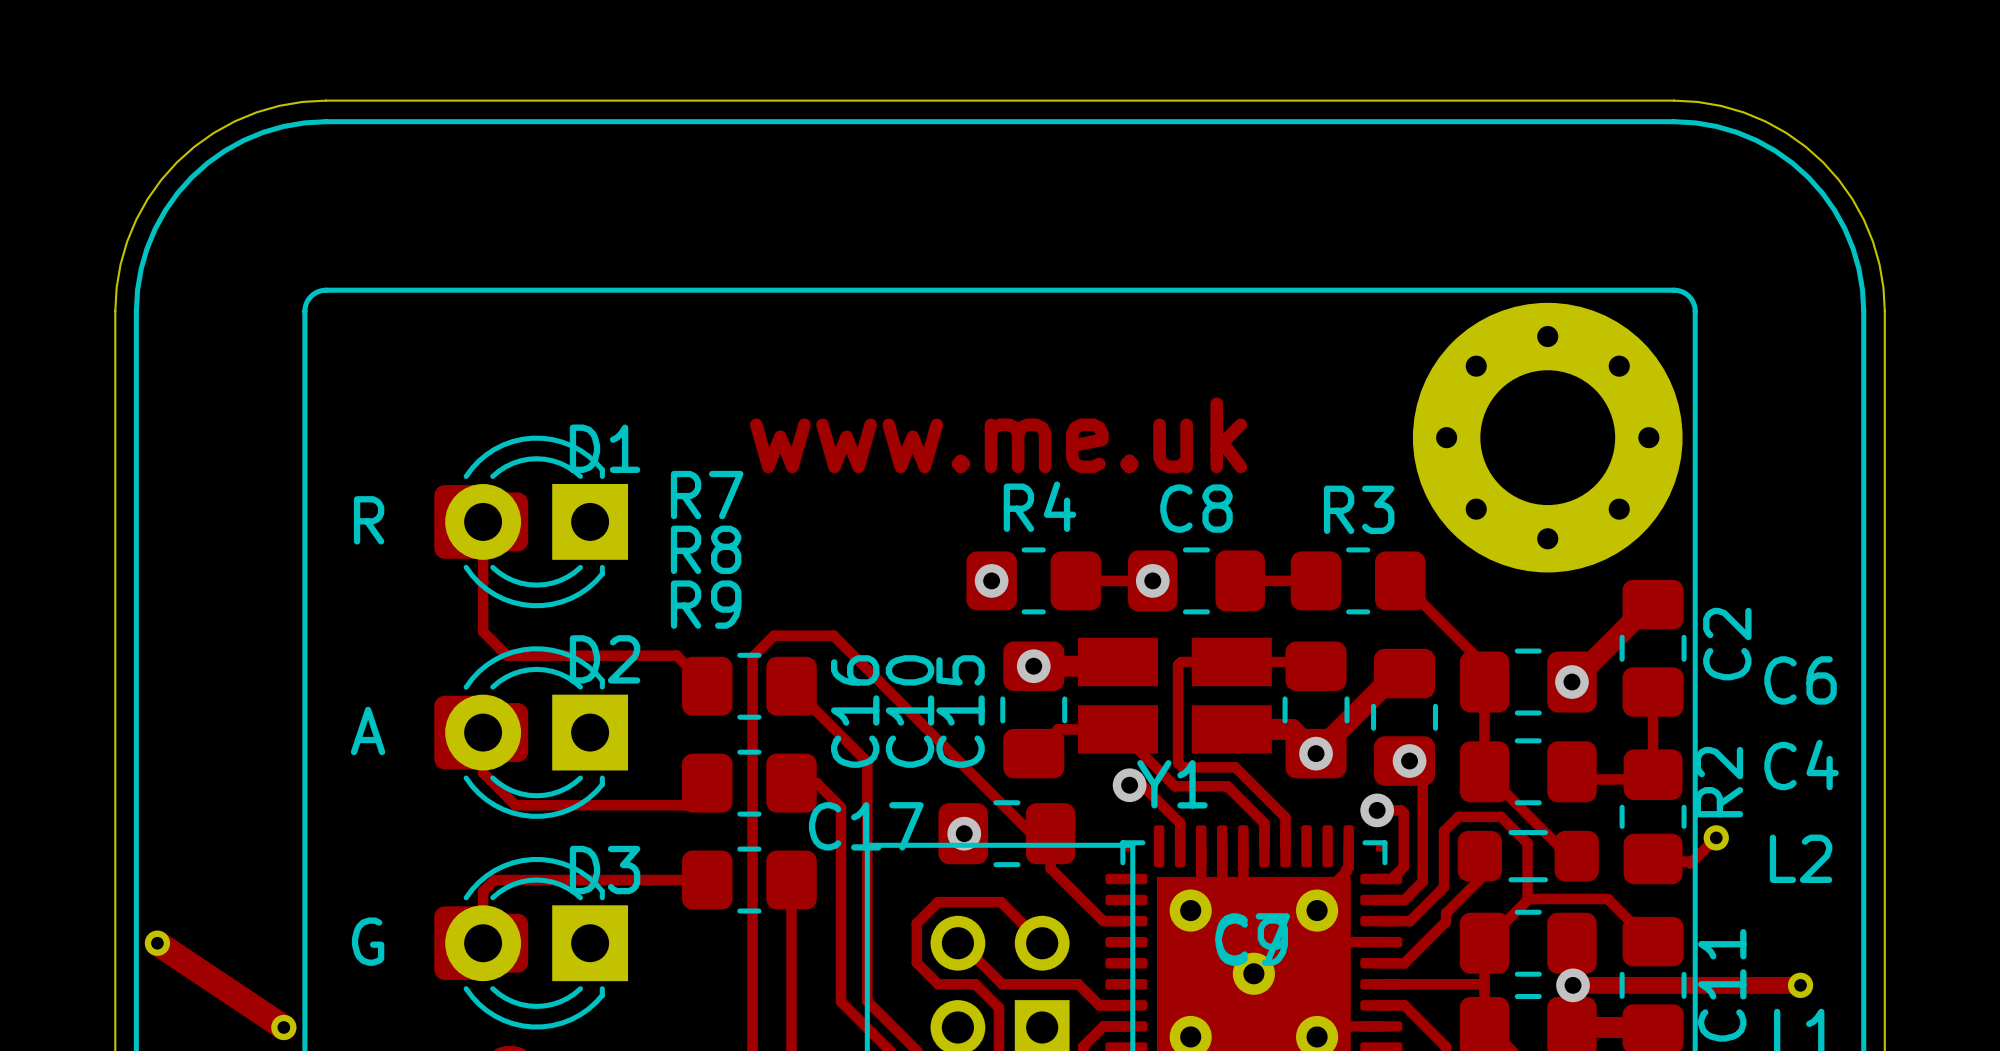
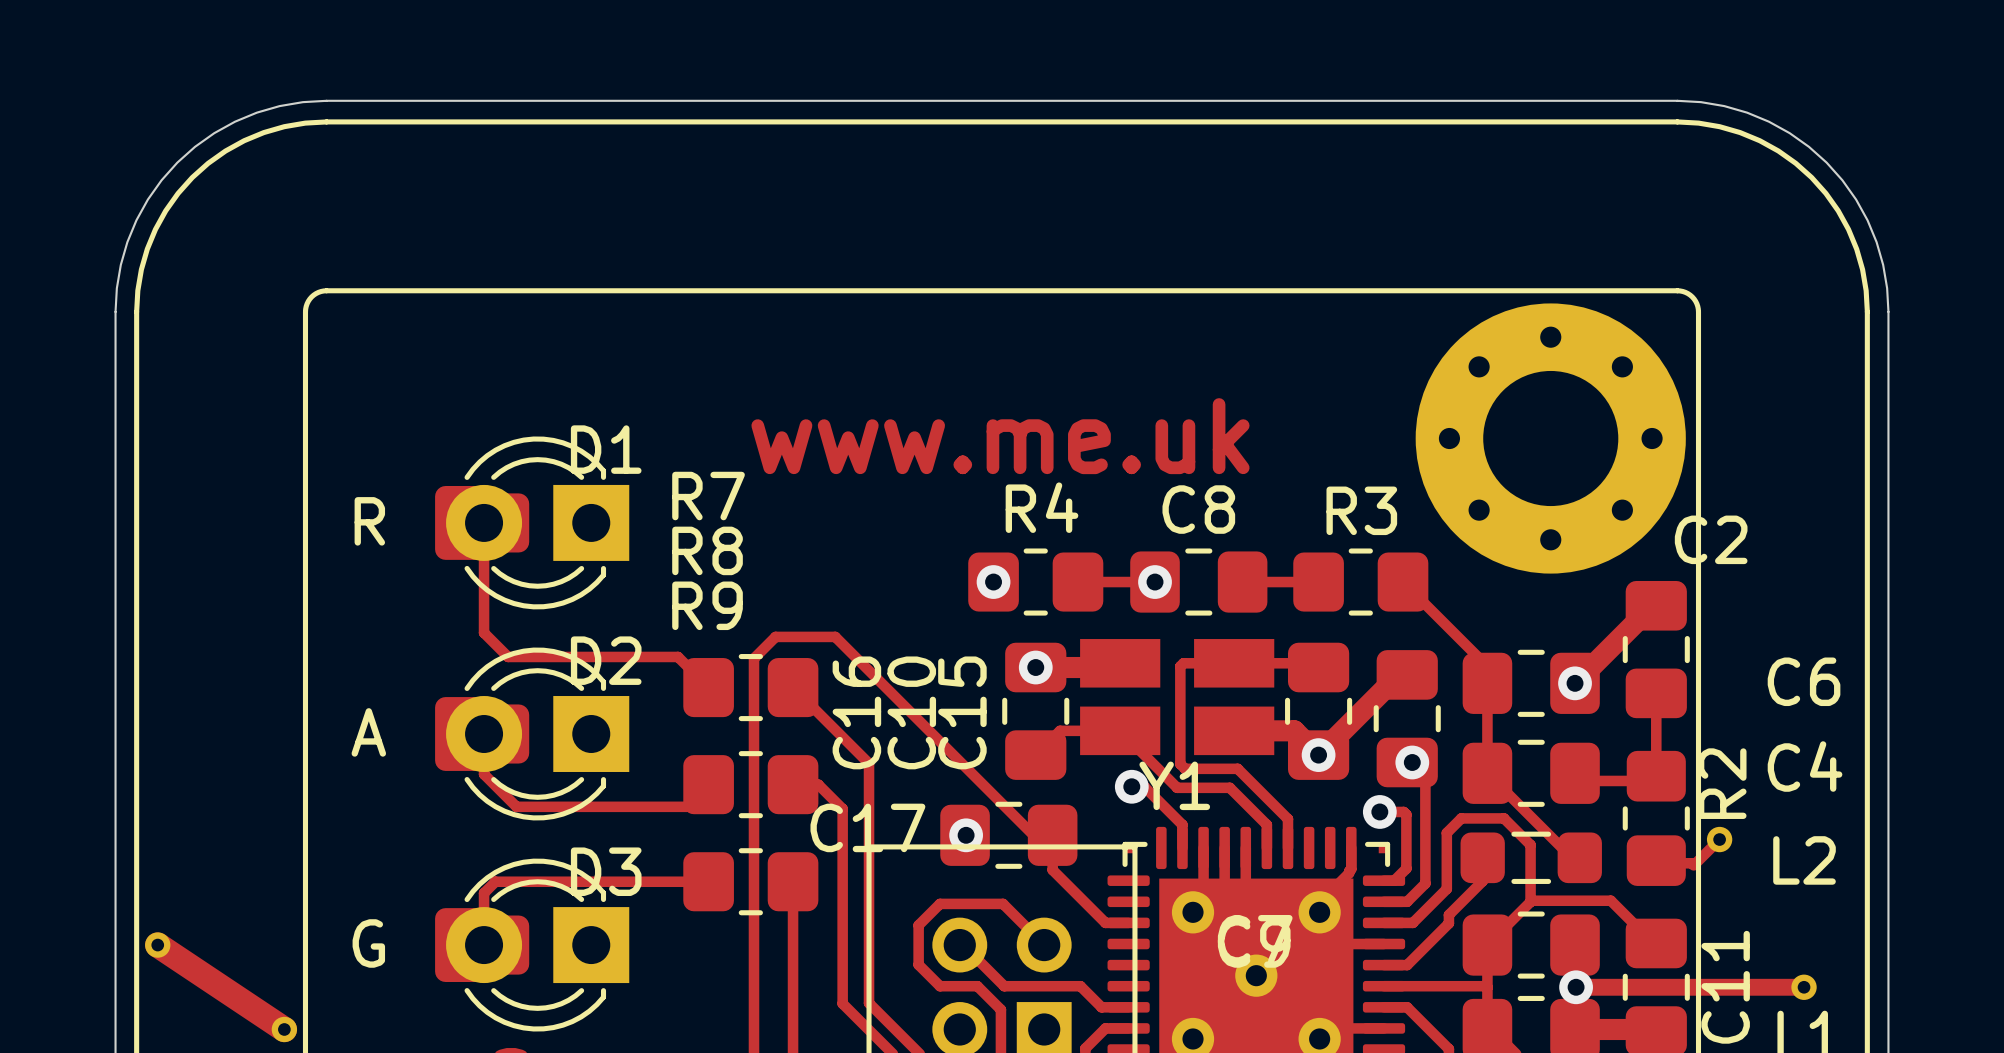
C2 name rotation: 0° (1727, 644) -> 90° clockwise (1711, 539)
C2 name position: C2 (1727, 644) -> C2 (1711, 539)

